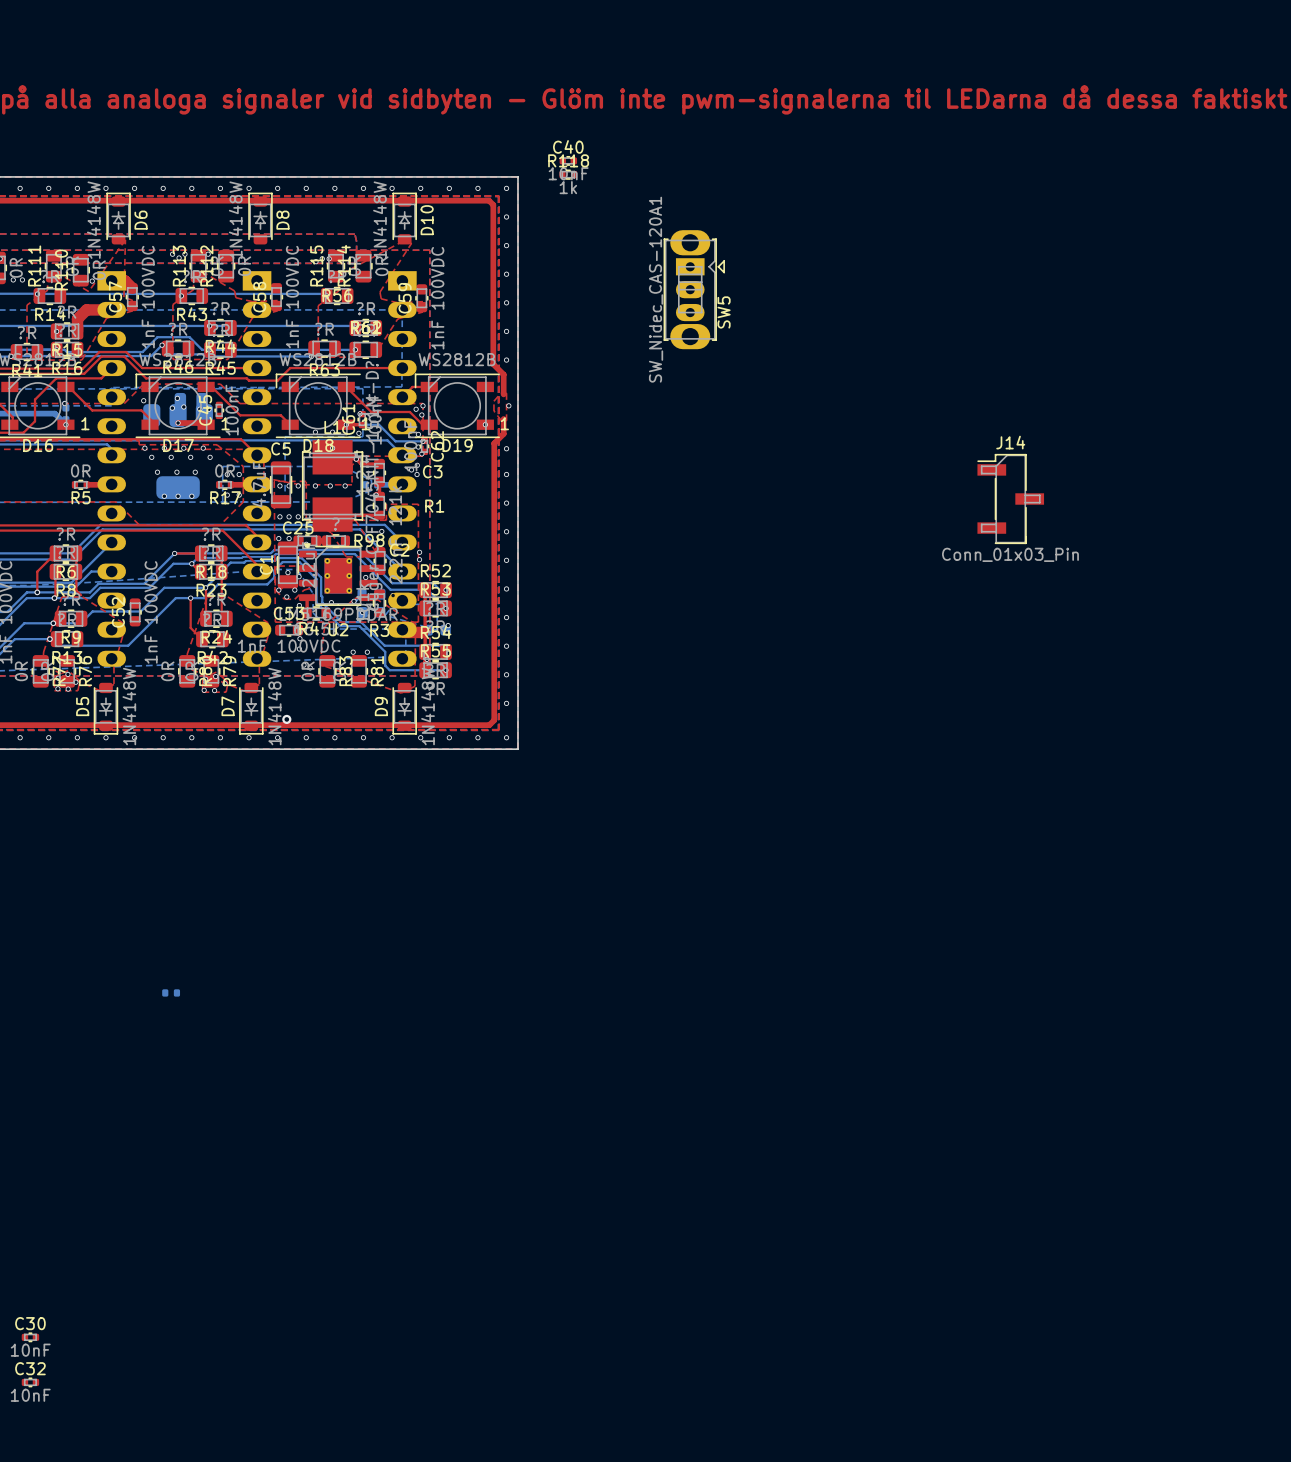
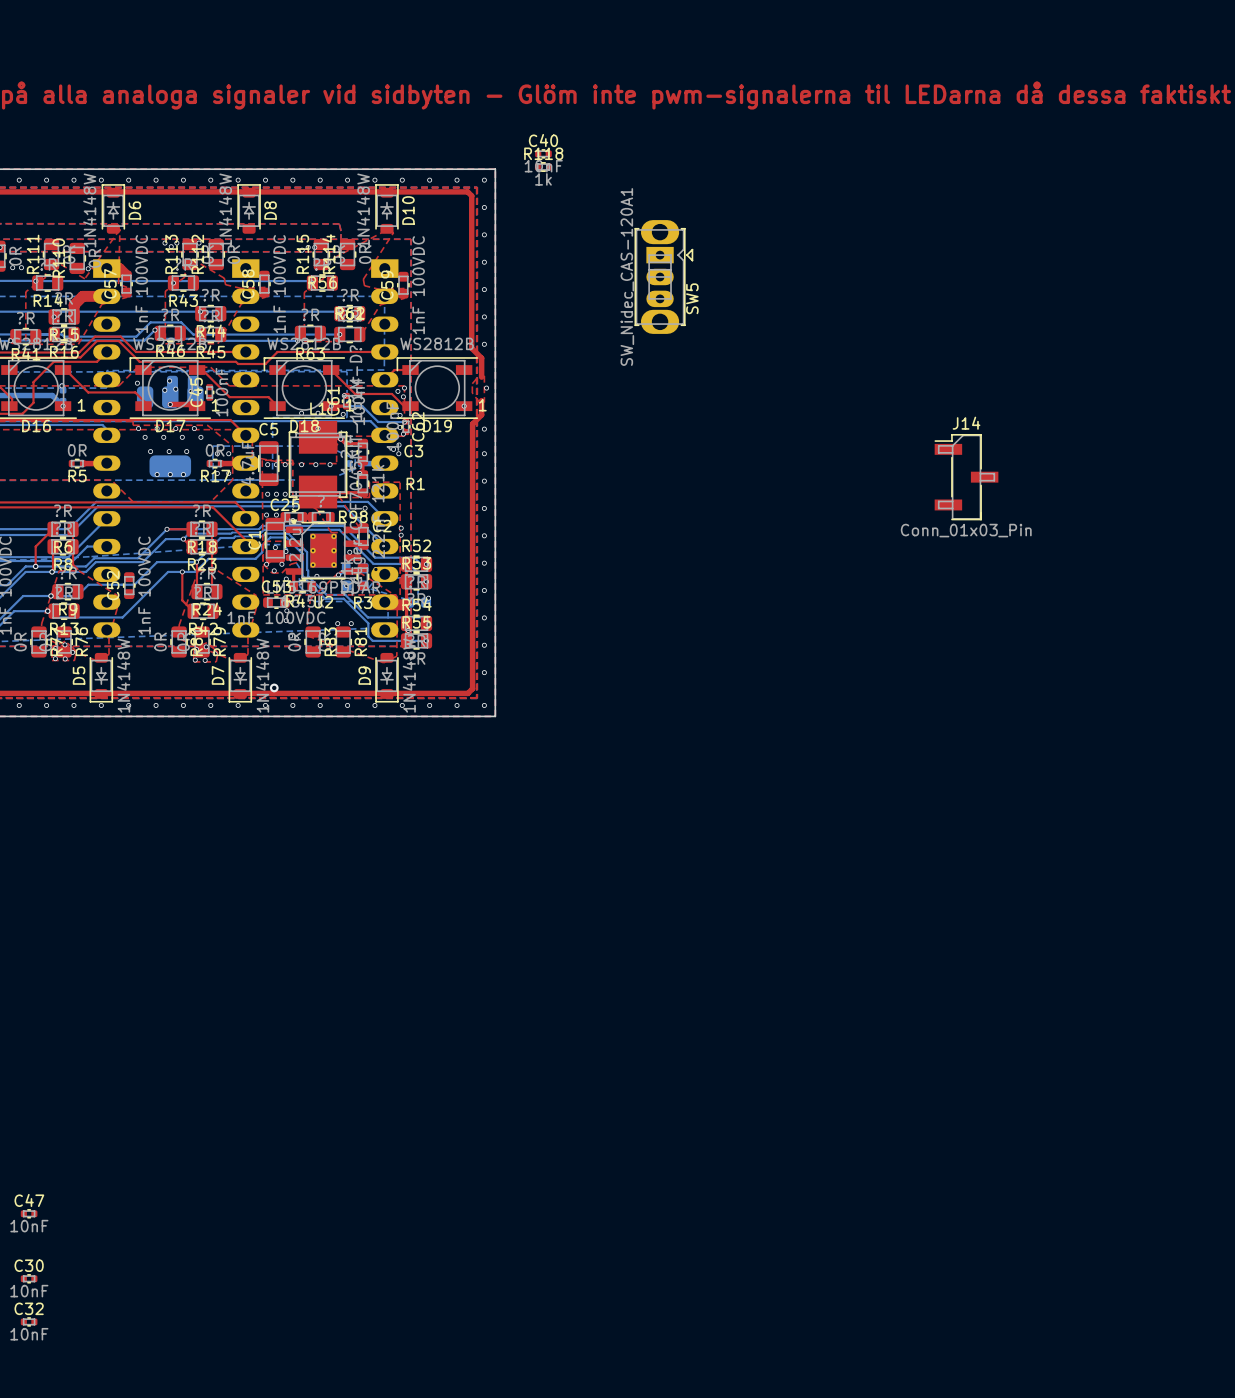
part: (171, 992) -> none
C47: none -> 10nF (29, 1213)

